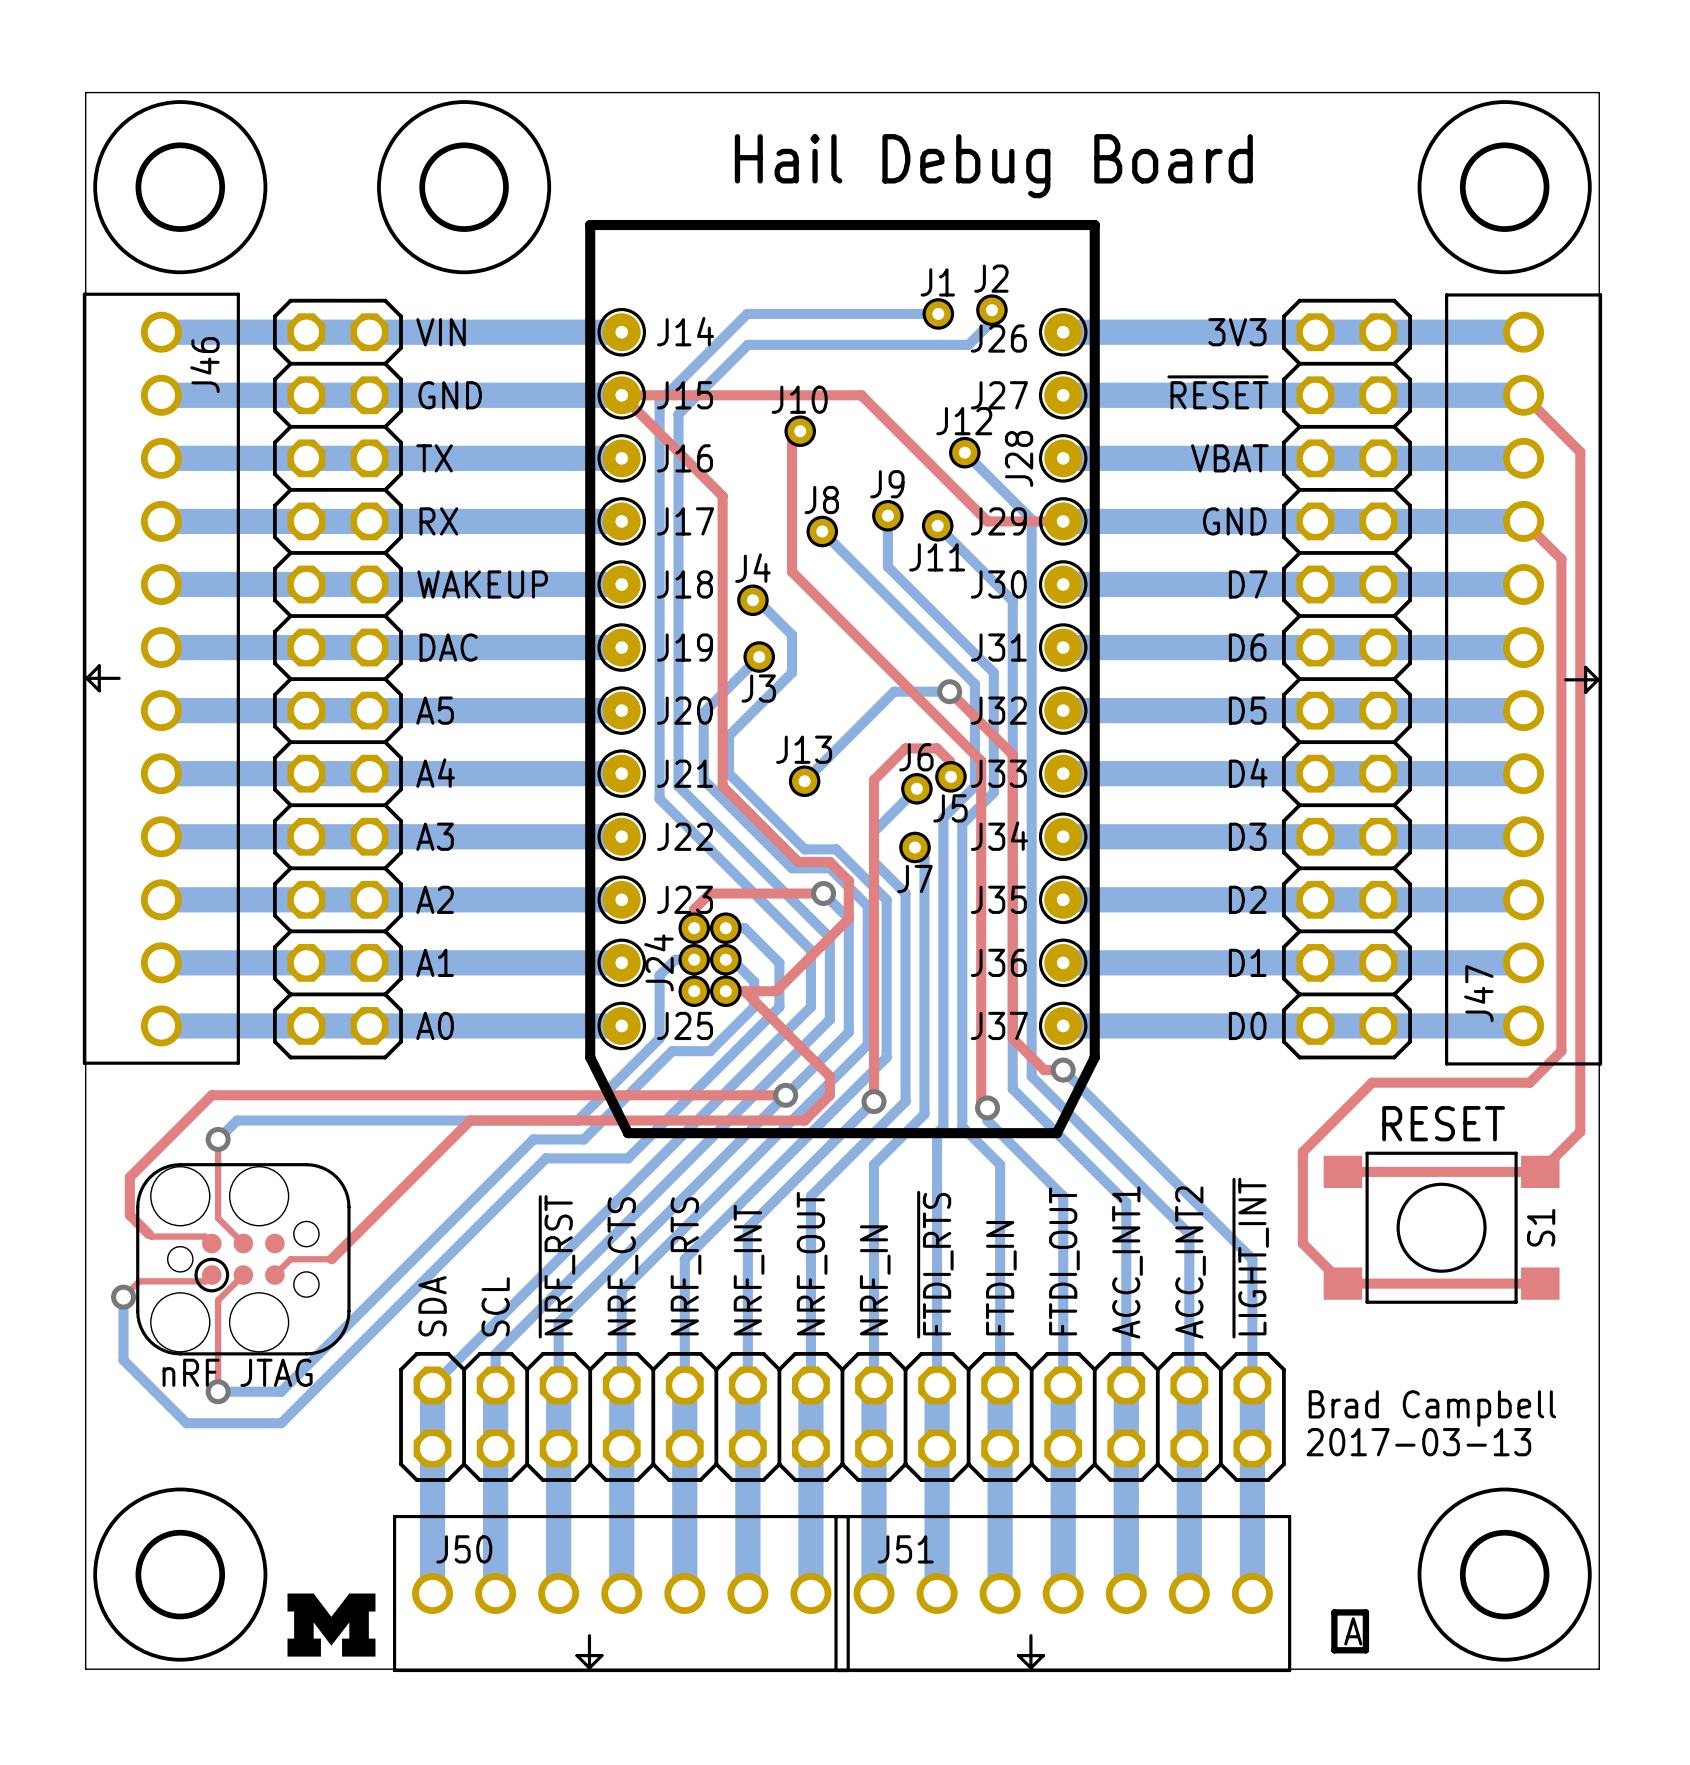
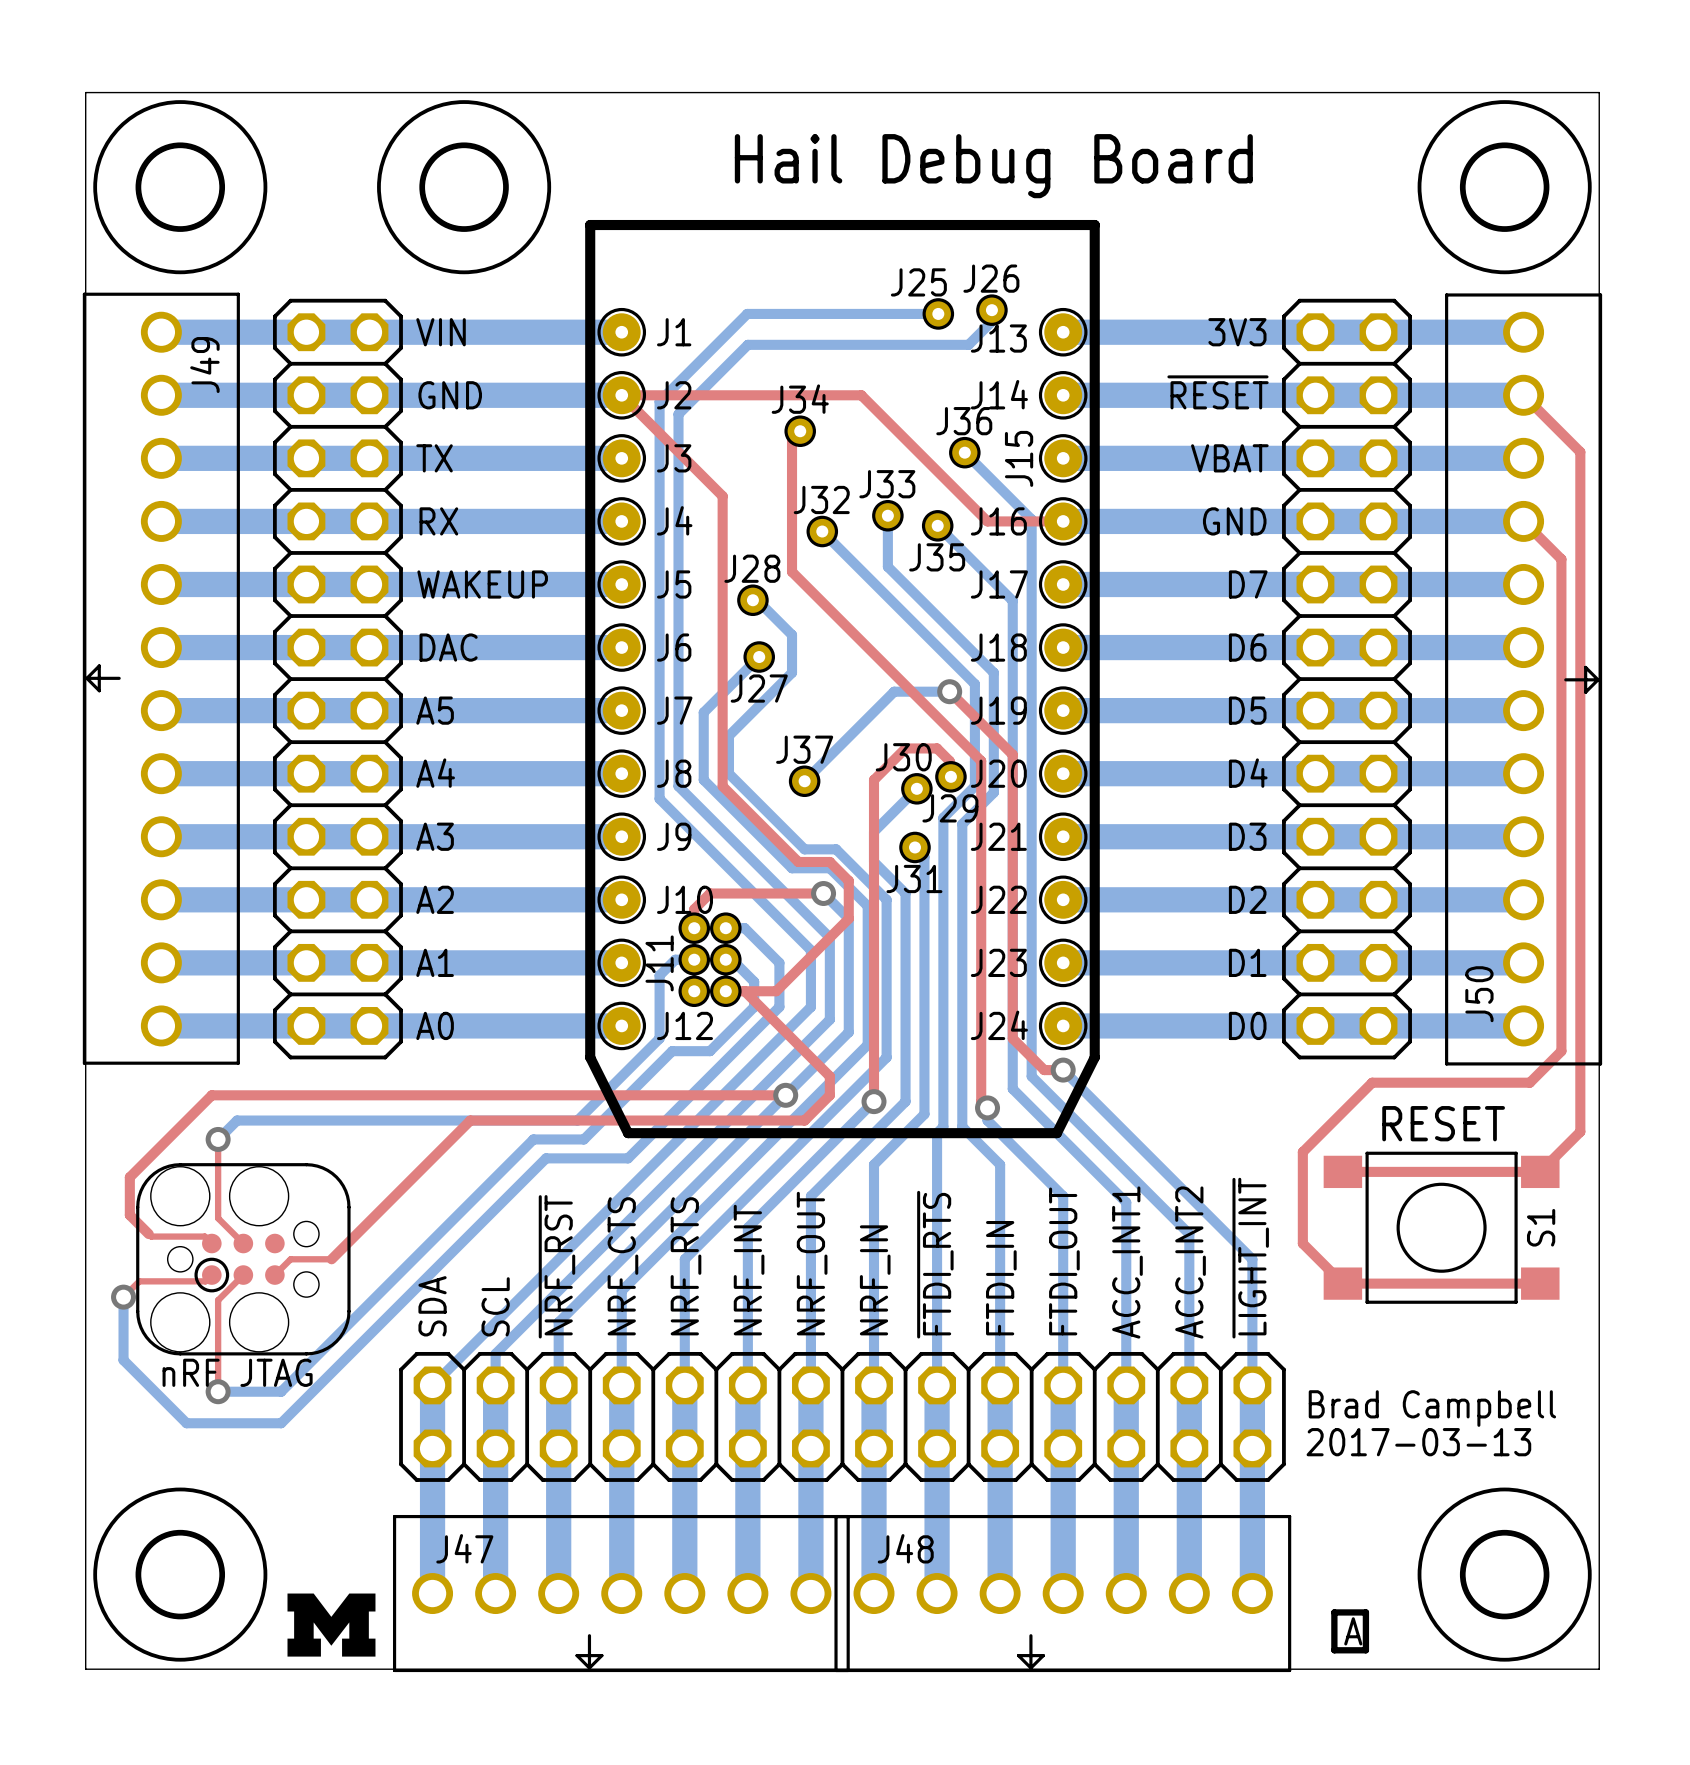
J2 name: J2 (991, 278) -> J26 (991, 278)
J1 name: J1 (937, 282) -> J25 (918, 282)
J14 name: J14 (685, 331) -> J1 (674, 332)
J26 name: J26 (998, 338) -> J13 (998, 338)
J46 name: J46 (204, 365) -> J49 (204, 365)
J15 name: J15 (685, 395) -> J2 (674, 395)
J27 name: J27 (999, 395) -> J14 (999, 394)
J10 name: J10 (799, 399) -> J34 (800, 399)
J12 name: J12 (964, 421) -> J36 (964, 421)
J16 name: J16 (685, 458) -> J3 (674, 458)
J28 name: J28 (1019, 458) -> J15 (1019, 458)
J9 name: J9 (887, 484) -> J33 (887, 484)
J8 name: J8 (821, 499) -> J32 (821, 499)
J17 name: J17 (685, 521) -> J4 (674, 520)
J29 name: J29 (998, 521) -> J16 (998, 521)
J11 name: J11 (937, 557) -> J35 (937, 557)
J4 name: J4 (752, 568) -> J28 (752, 568)
J18 name: J18 (685, 584) -> J5 (674, 584)
J30 name: J30 (998, 584) -> J17 (999, 584)
J19 name: J19 (685, 647) -> J6 (674, 647)
J31 name: J31 (998, 647) -> J18 (998, 647)
J3 name: J3 (758, 688) -> J27 (759, 688)
J20 name: J20 (685, 710) -> J7 (674, 710)
J32 name: J32 (998, 710) -> J19 (998, 710)
J13 name: J13 (804, 749) -> J37 (804, 749)
J6 name: J6 (916, 757) -> J30 (903, 757)
J21 name: J21 (685, 773) -> J8 (674, 773)
J33 name: J33 (998, 773) -> J20 (998, 773)
J5 name: J5 (950, 808) -> J29 (950, 808)
J22 name: J22 (685, 836) -> J9 (674, 836)
J34 name: J34 (999, 836) -> J21 (998, 836)
J7 name: J7 (915, 879) -> J31 (914, 879)
J23 name: J23 (685, 899) -> J10 (685, 899)
J35 name: J35 (998, 899) -> J22 (998, 899)
J24 name: J24 (658, 962) -> J11 (659, 963)
J36 name: J36 (998, 962) -> J23 (998, 962)
J47 name: J47 (1478, 993) -> J50 (1479, 994)
J25 name: J25 (685, 1025) -> J12 (685, 1025)
J37 name: J37 (999, 1025) -> J24 (999, 1025)
J50 name: J50 (464, 1549) -> J47 (464, 1548)
J51 name: J51 (905, 1549) -> J48 (905, 1548)

